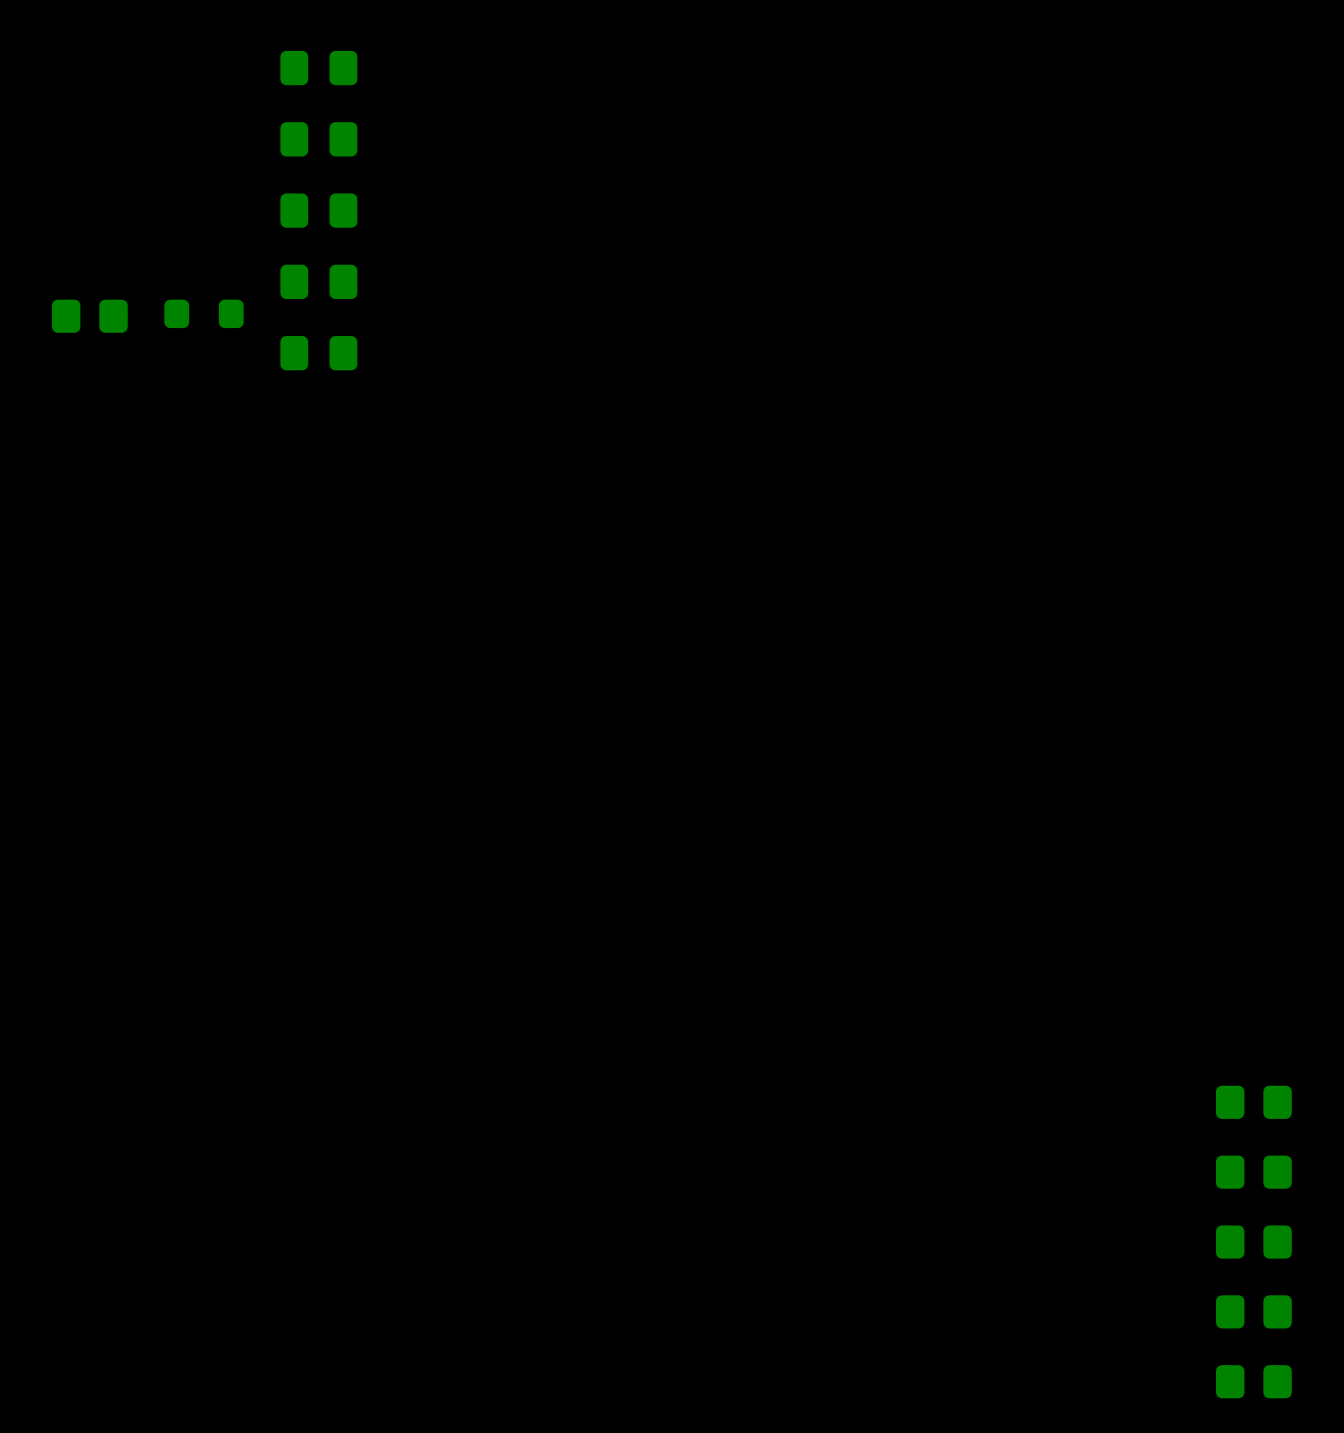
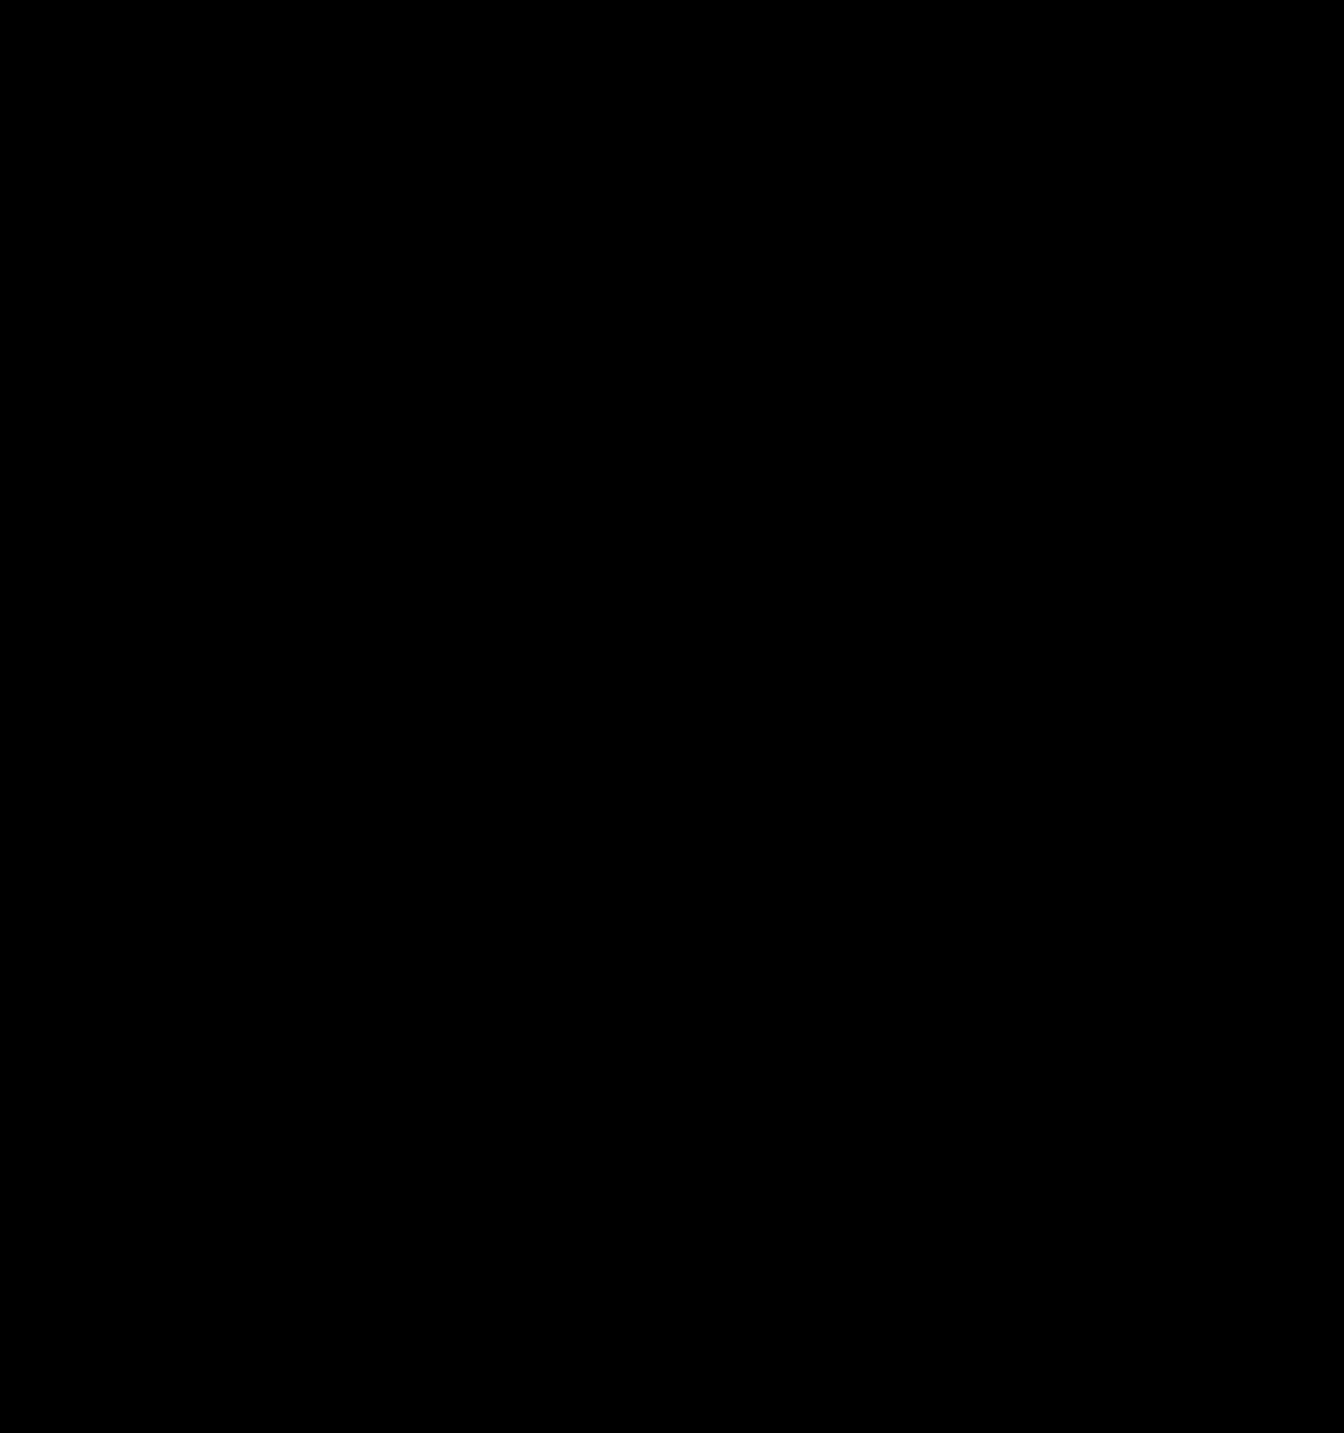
part: (318, 68) -> none
part: (318, 139) -> none
part: (318, 210) -> none
part: (318, 281) -> none
part: (204, 313) -> none
part: (89, 316) -> none
part: (318, 353) -> none
part: (1253, 1102) -> none
part: (1253, 1172) -> none
part: (1253, 1242) -> none
part: (1253, 1311) -> none
part: (1253, 1381) -> none

